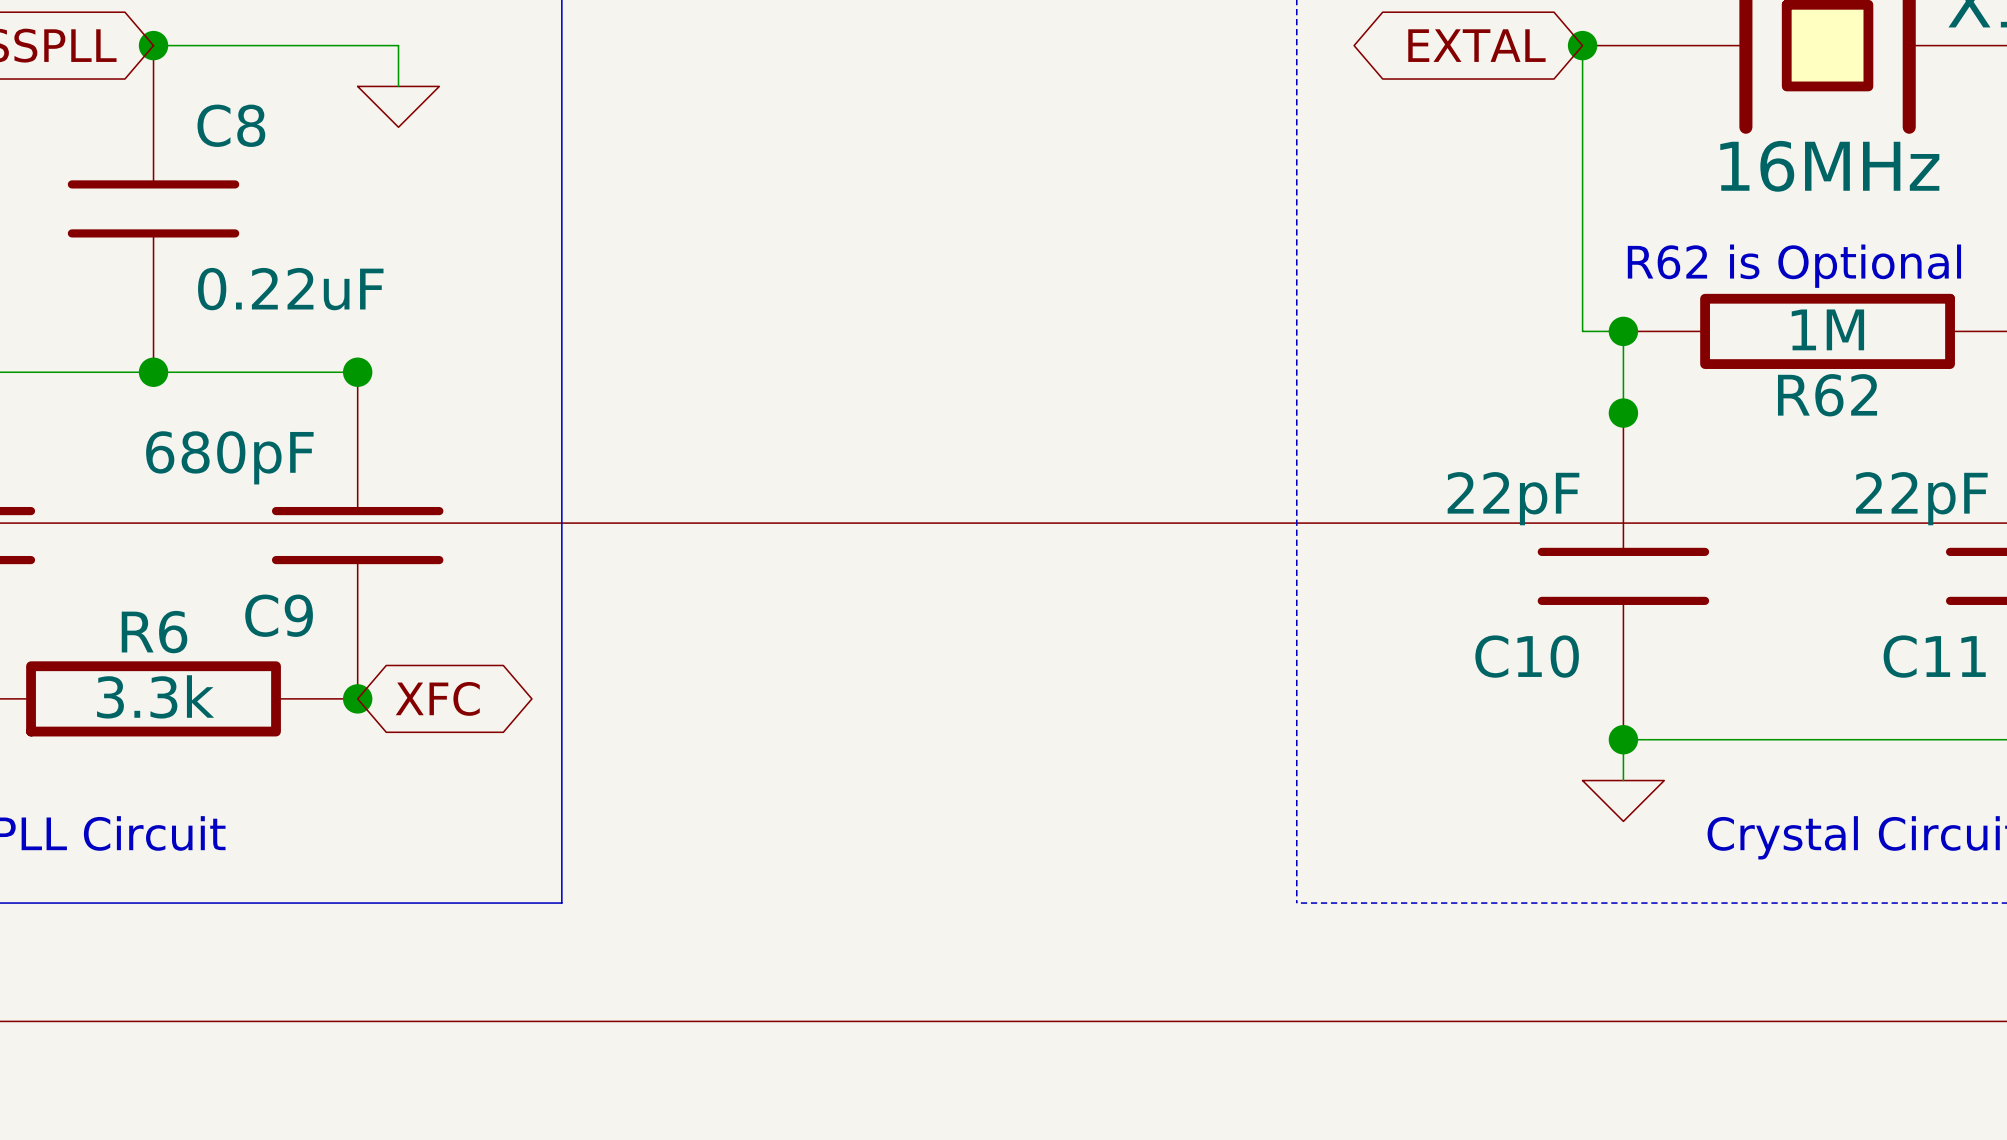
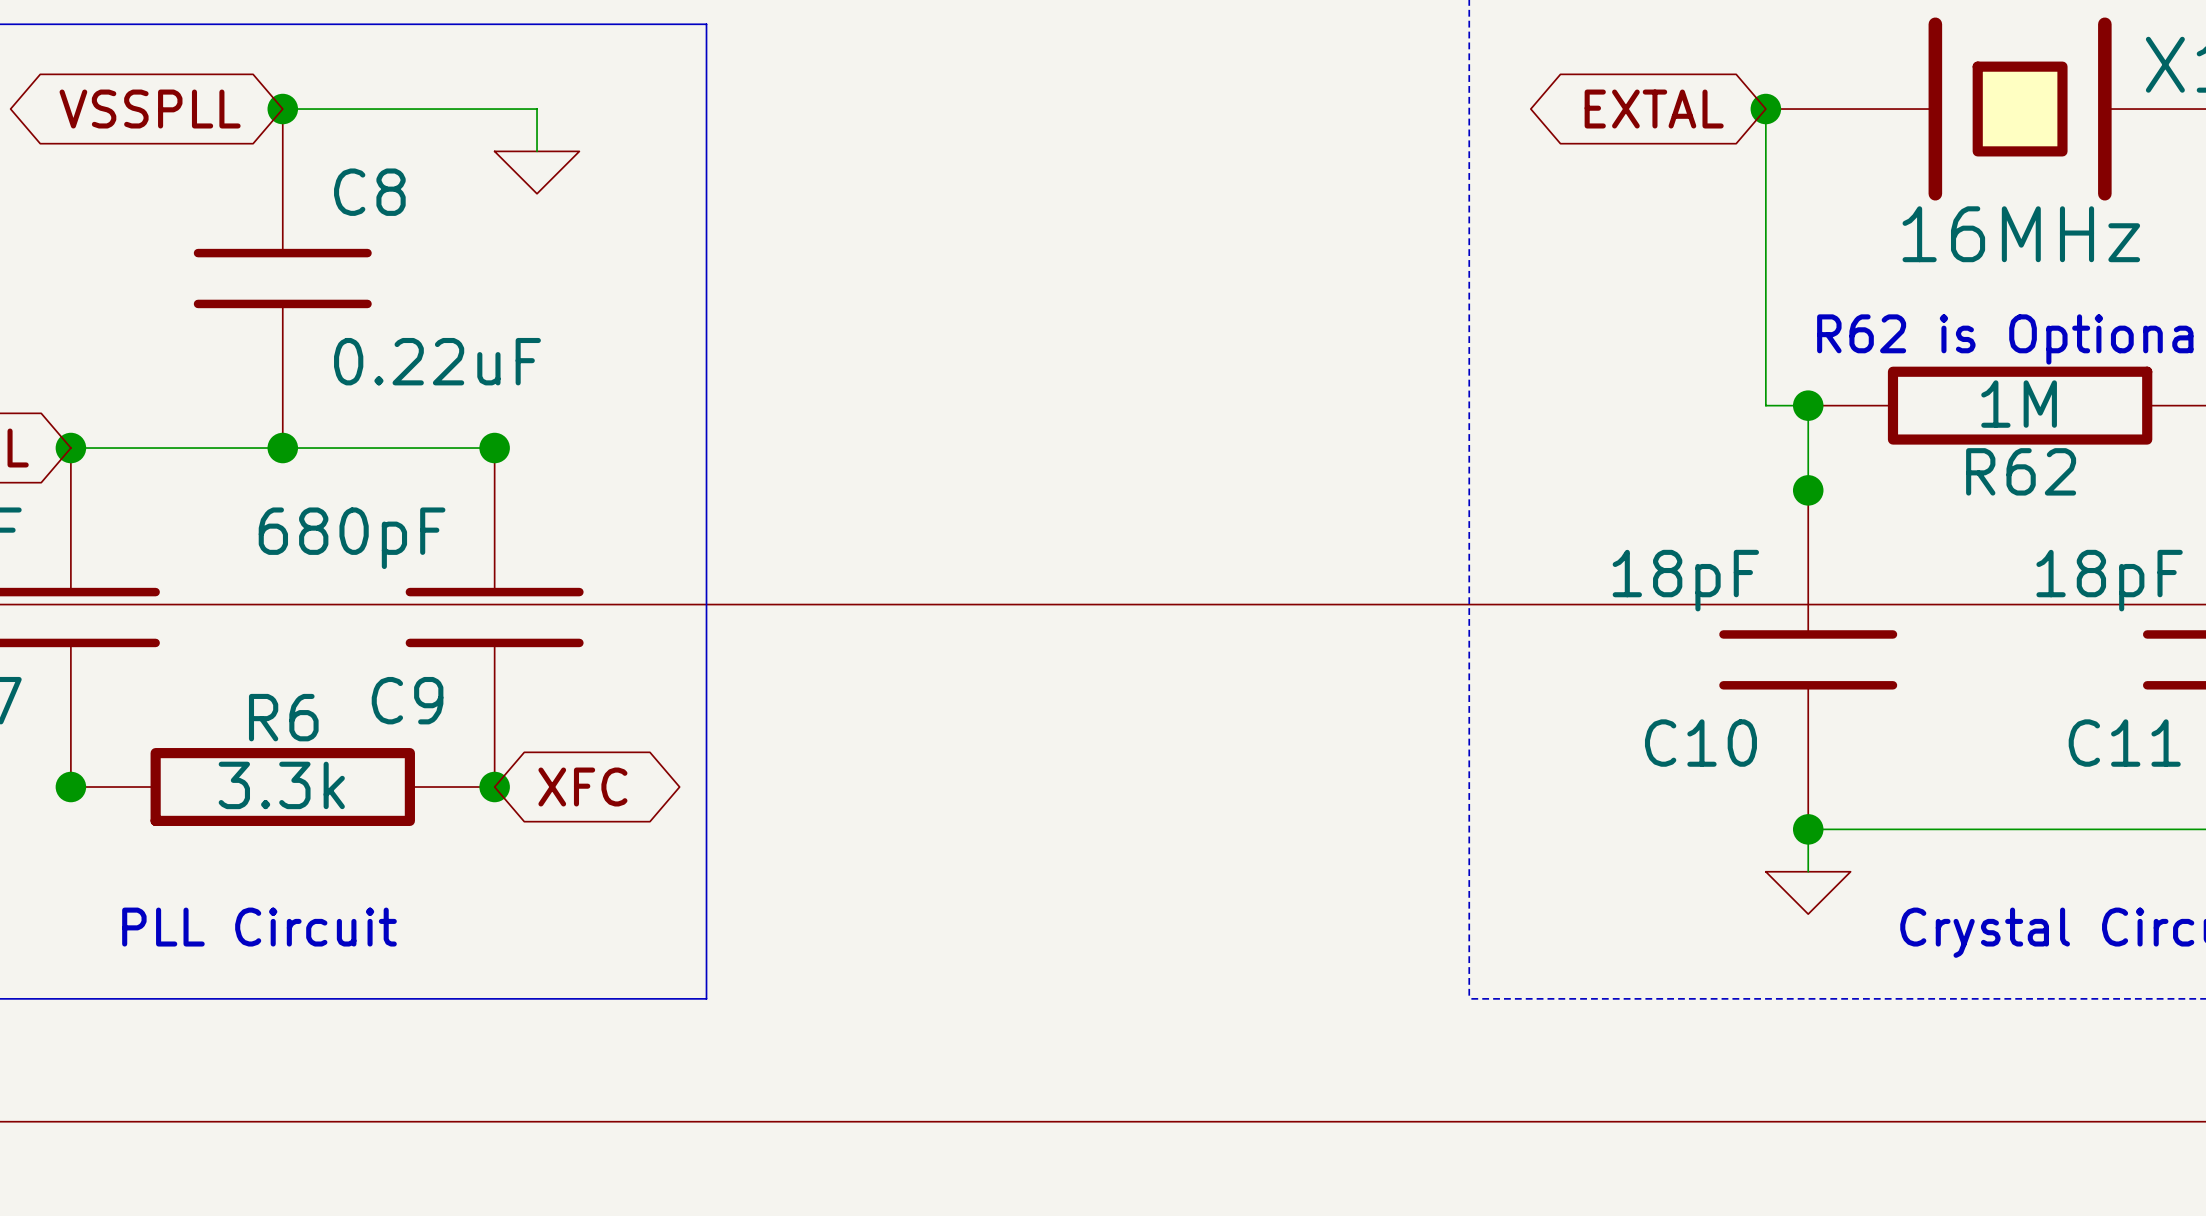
C10 value: 22pF (1513, 498) -> 18pF (1685, 580)
C11 value: 22pF (1921, 498) -> 18pF (2109, 580)

